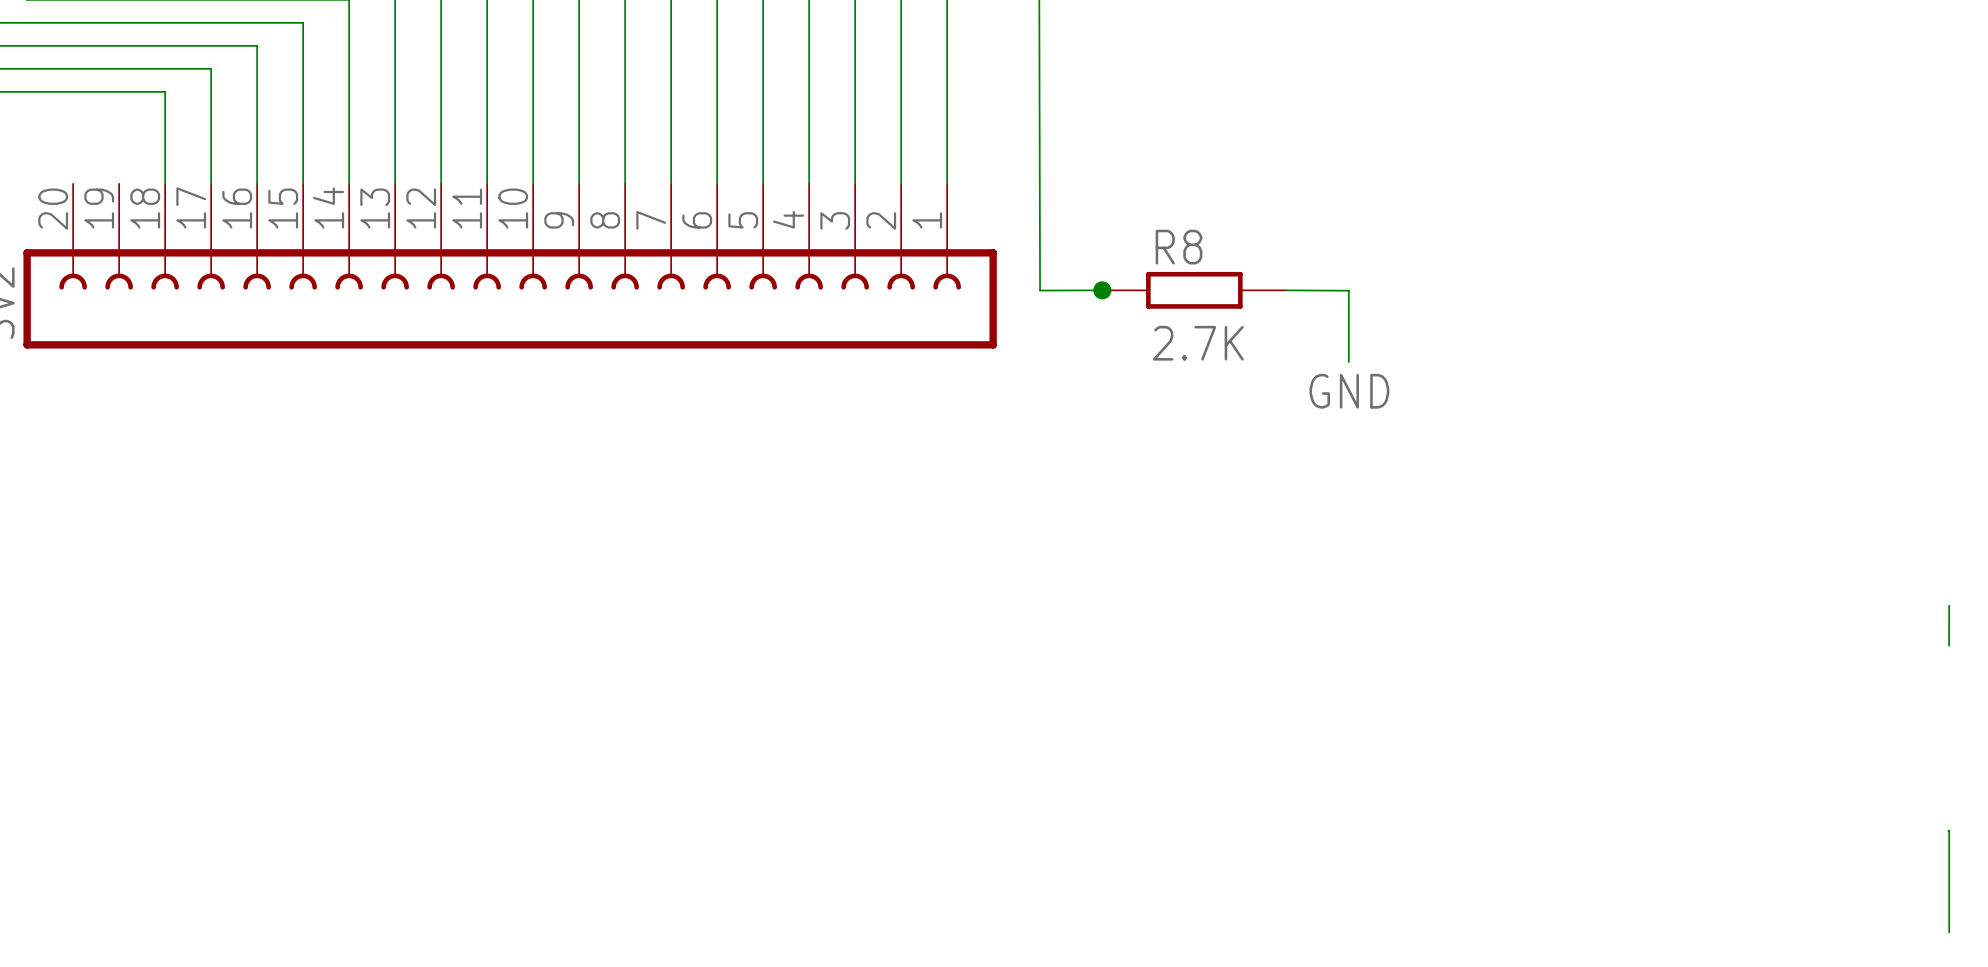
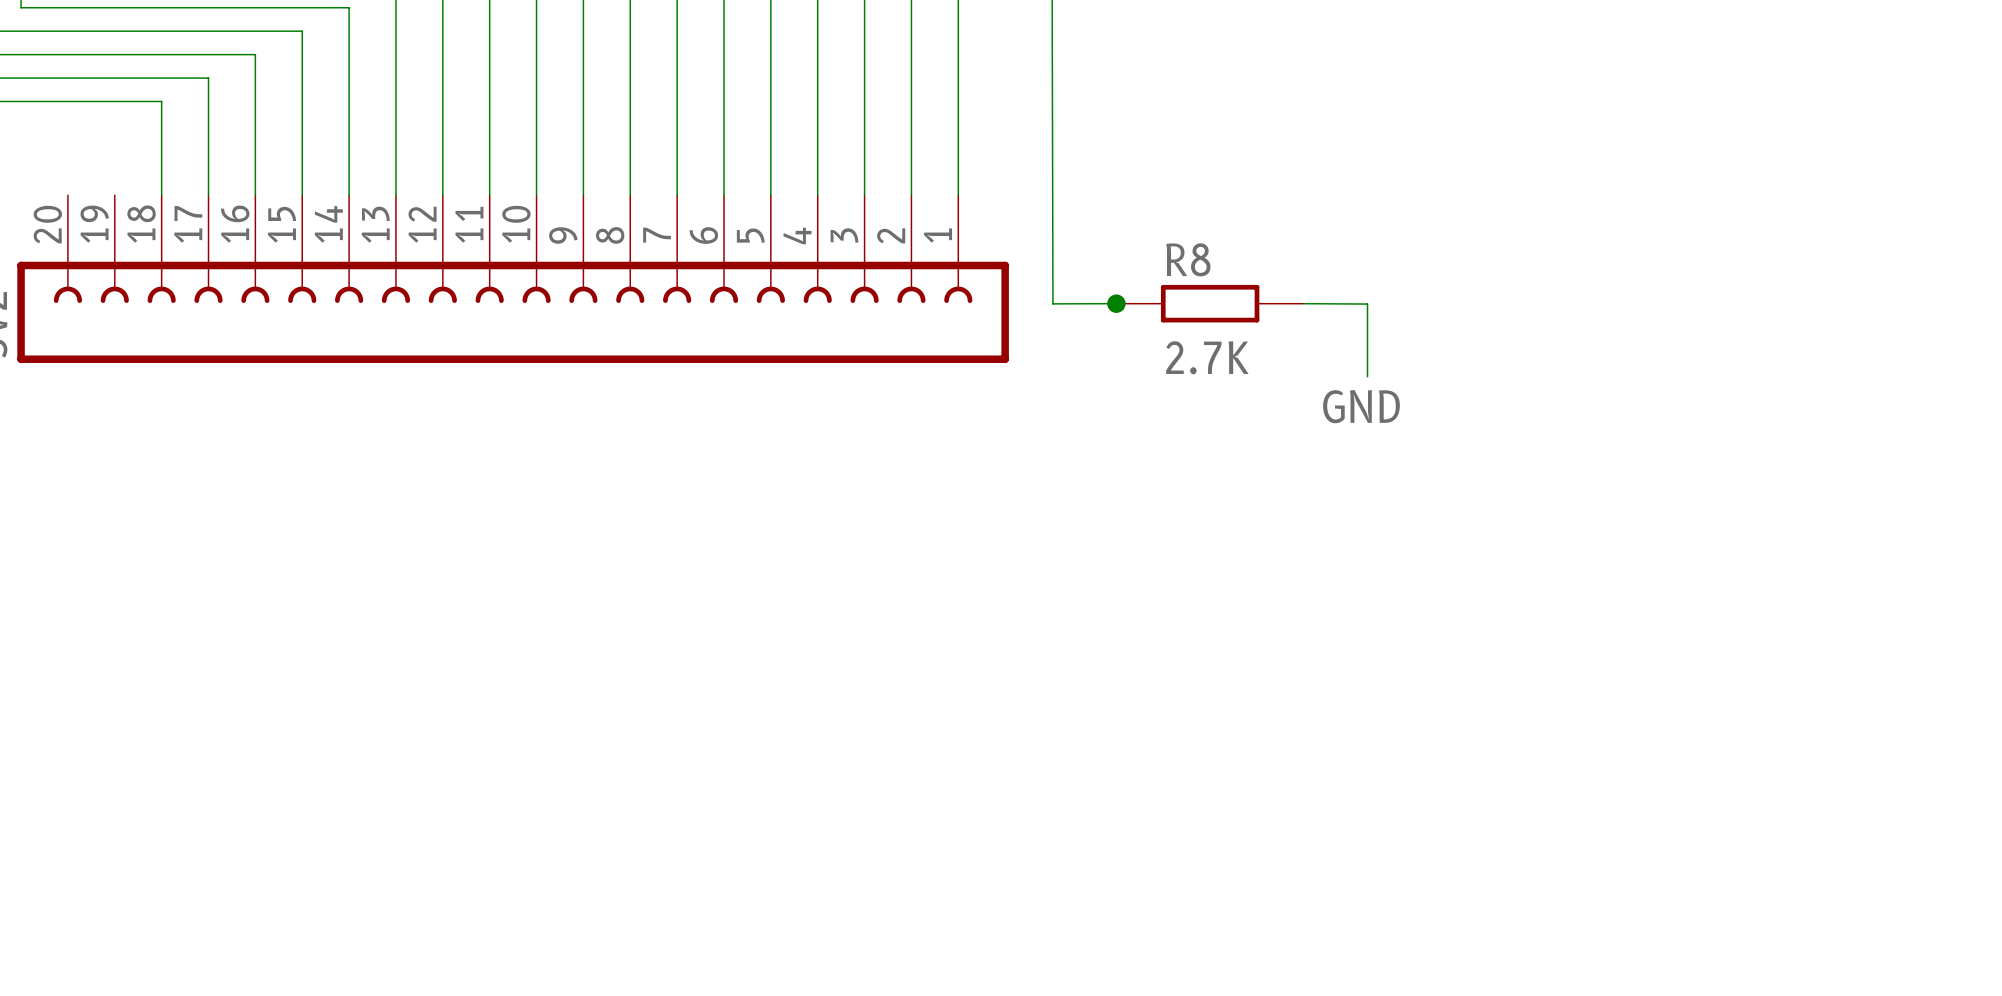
wire: (1949, 605) (1949, 645) -> none
wire: (1948, 831) (1949, 932) -> none

